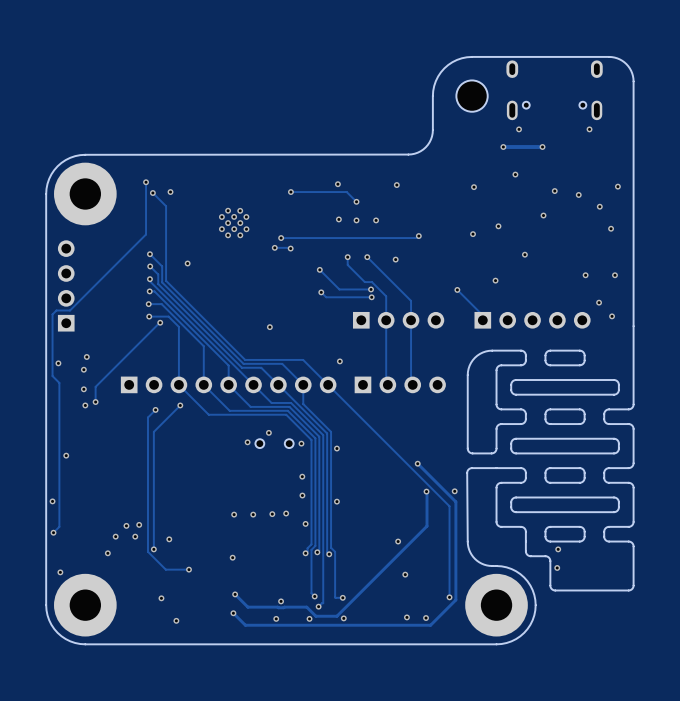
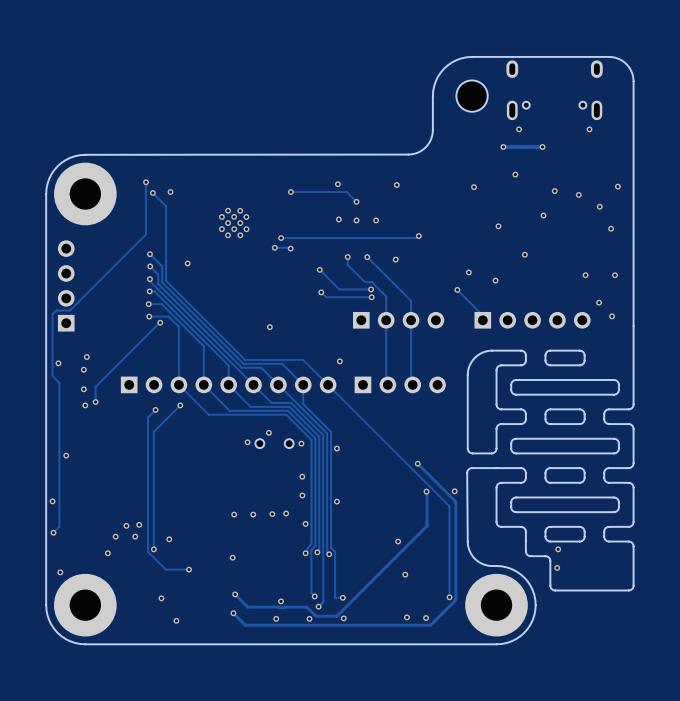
via position: (473, 234) -> (468, 272)

